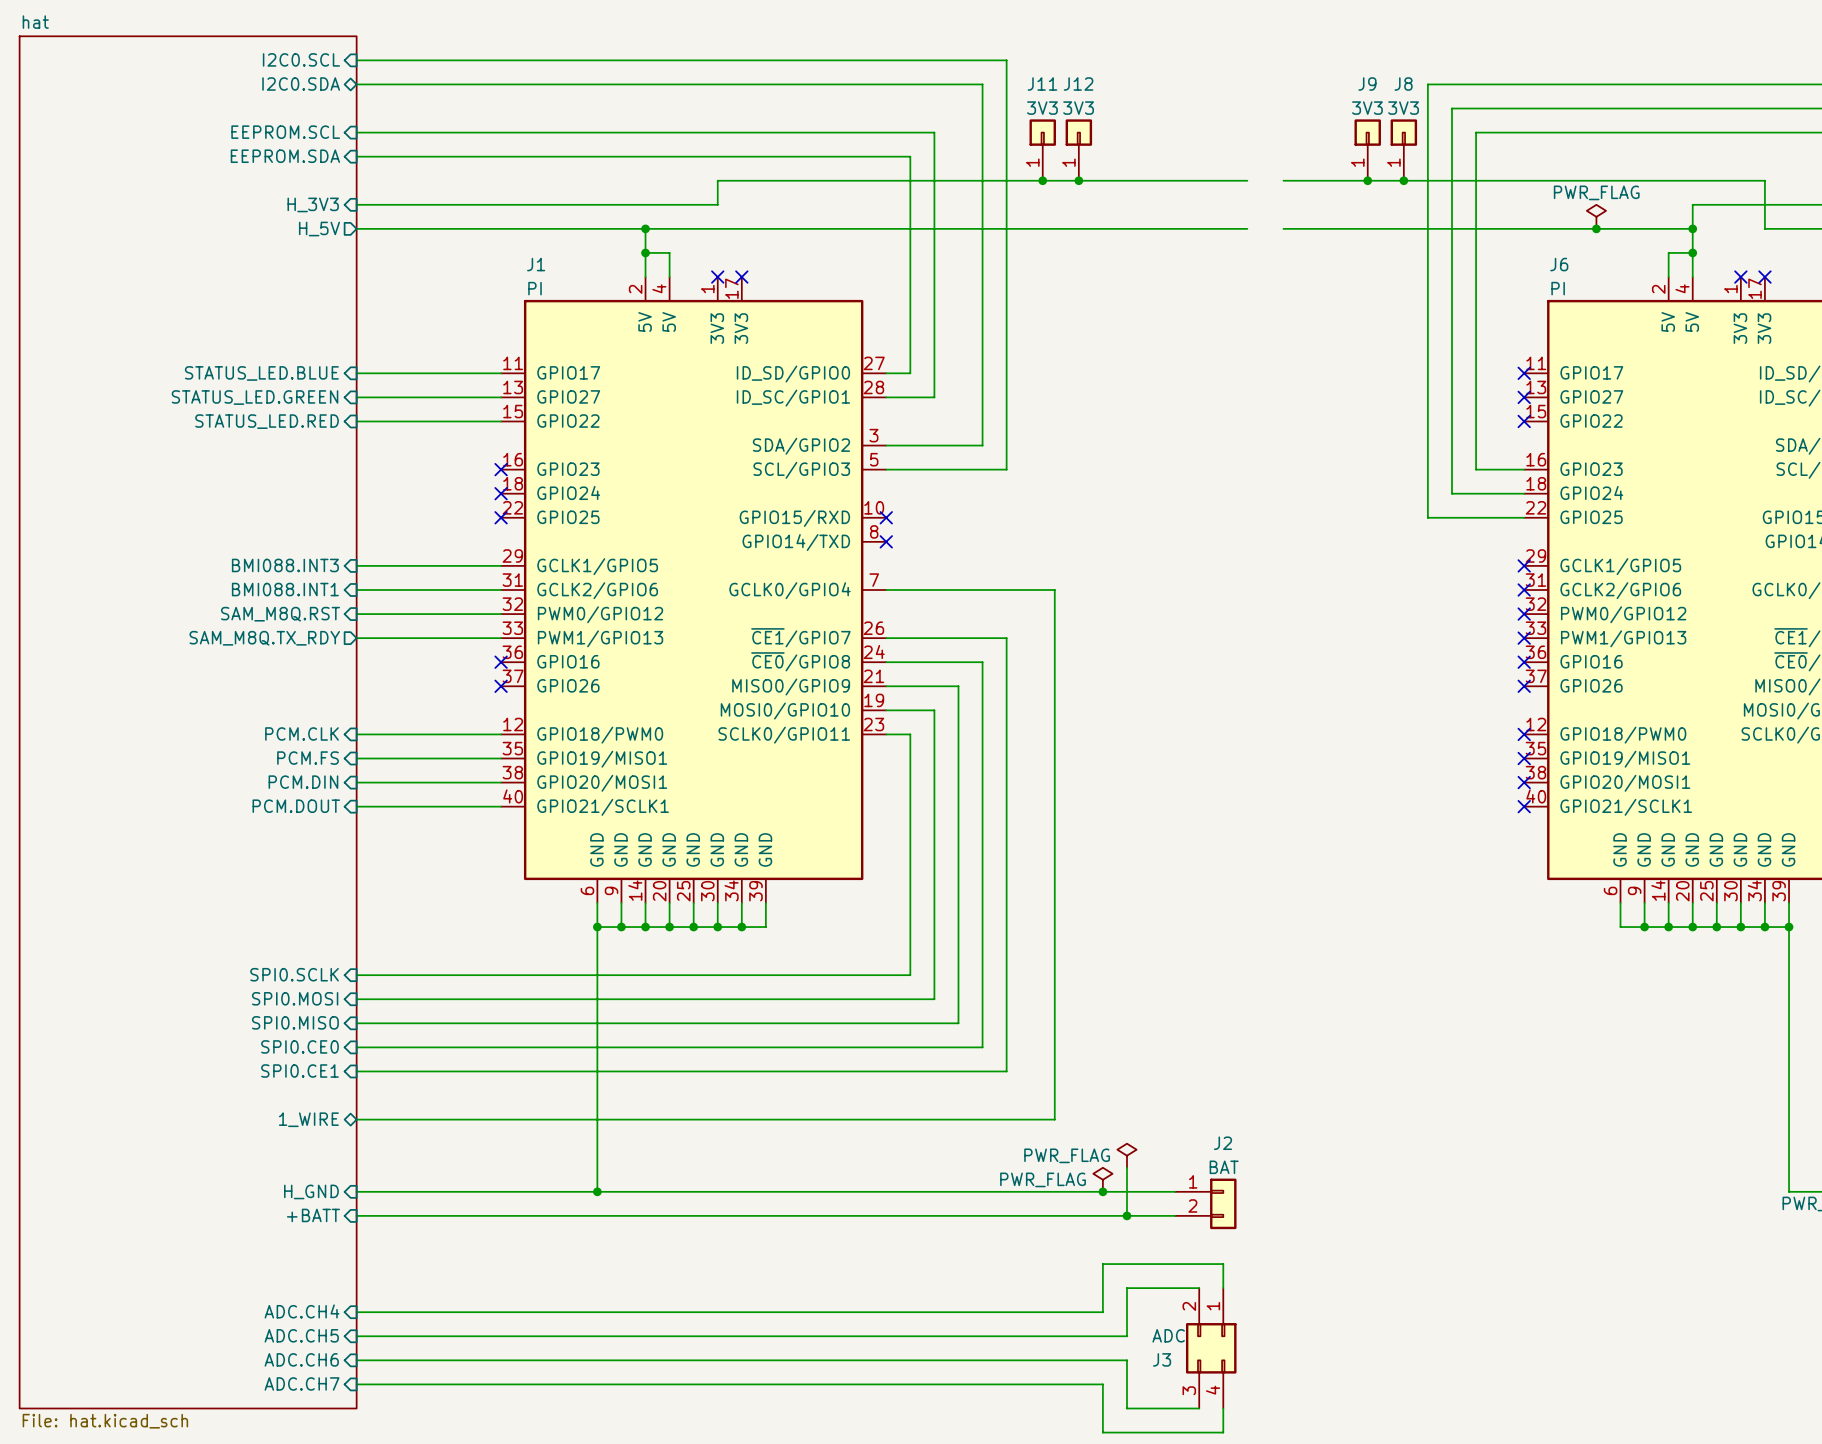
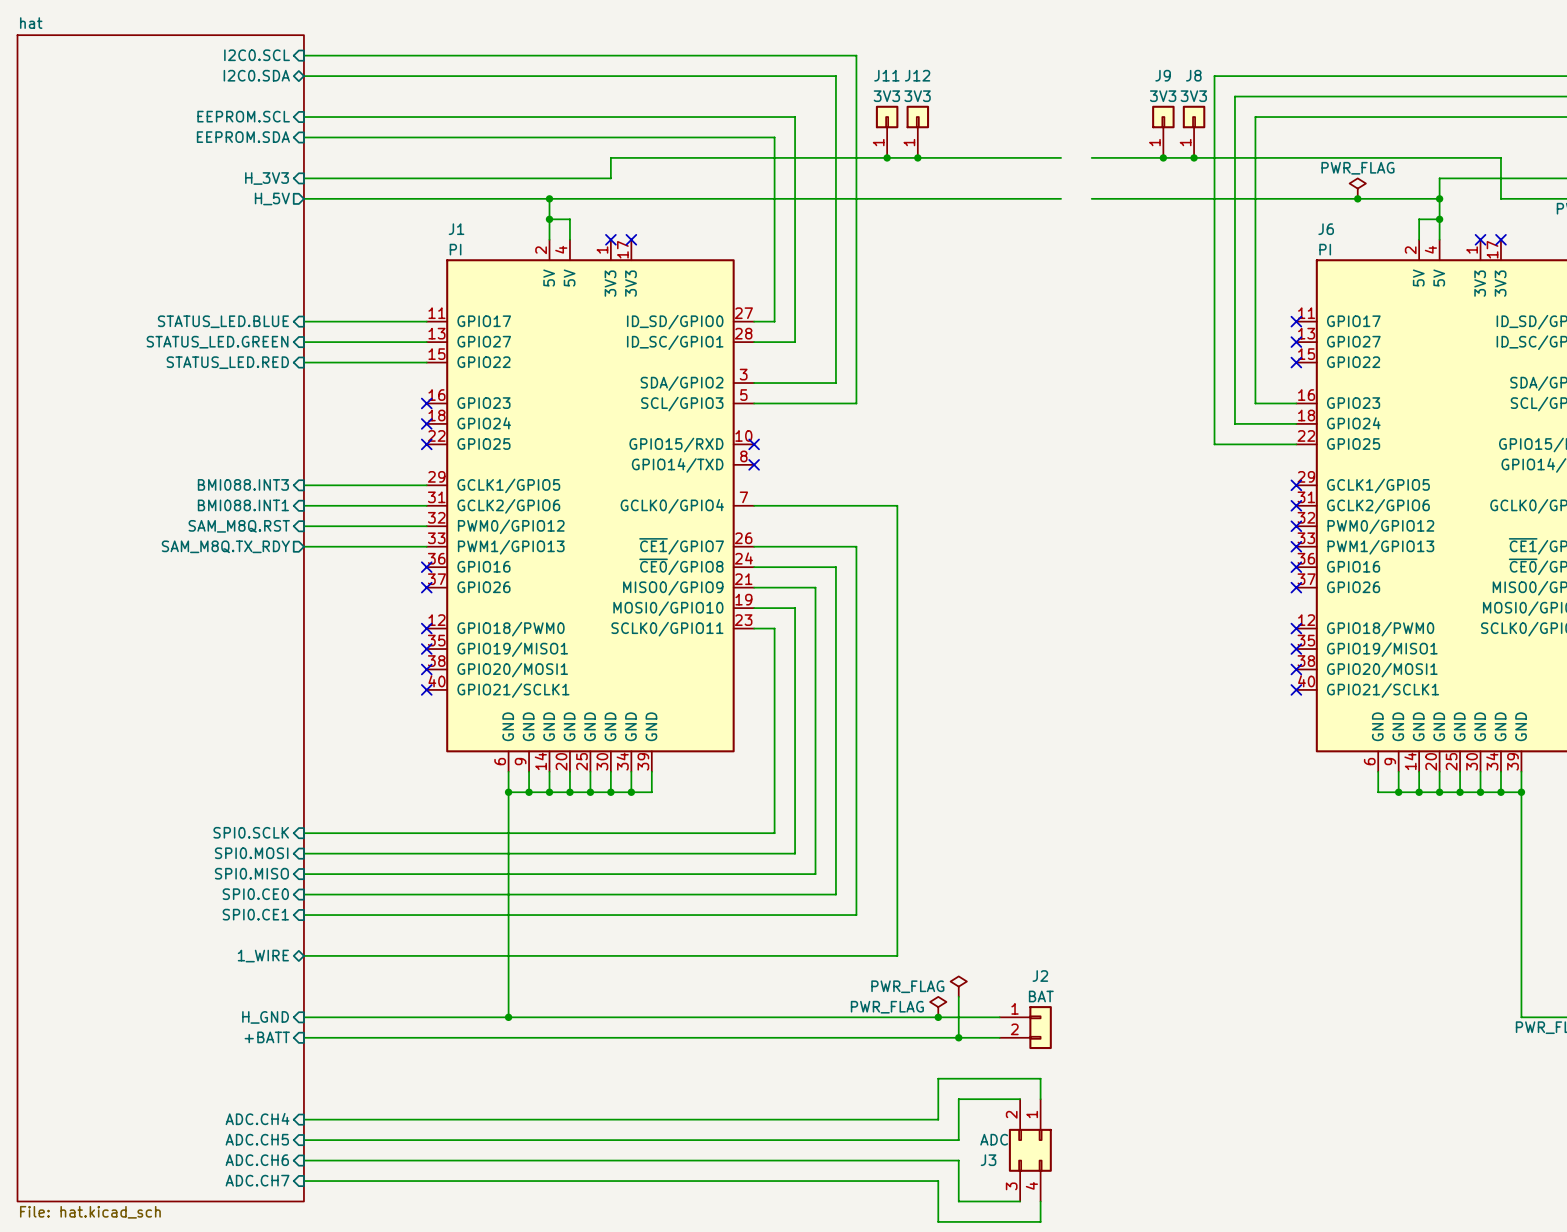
sheet pin: PCM.CLK (302, 733) -> none
wire: (356, 734) (501, 734) -> none
no-connect mark: none -> (426, 628)
sheet pin: PCM.FS (308, 758) -> none
wire: (356, 758) (501, 758) -> none
no-connect mark: none -> (426, 649)
sheet pin: PCM.DIN (303, 782) -> none
wire: (356, 782) (501, 782) -> none
no-connect mark: none -> (426, 669)
sheet pin: PCM.DOUT (296, 806) -> none
wire: (356, 806) (501, 806) -> none
no-connect mark: none -> (426, 689)

